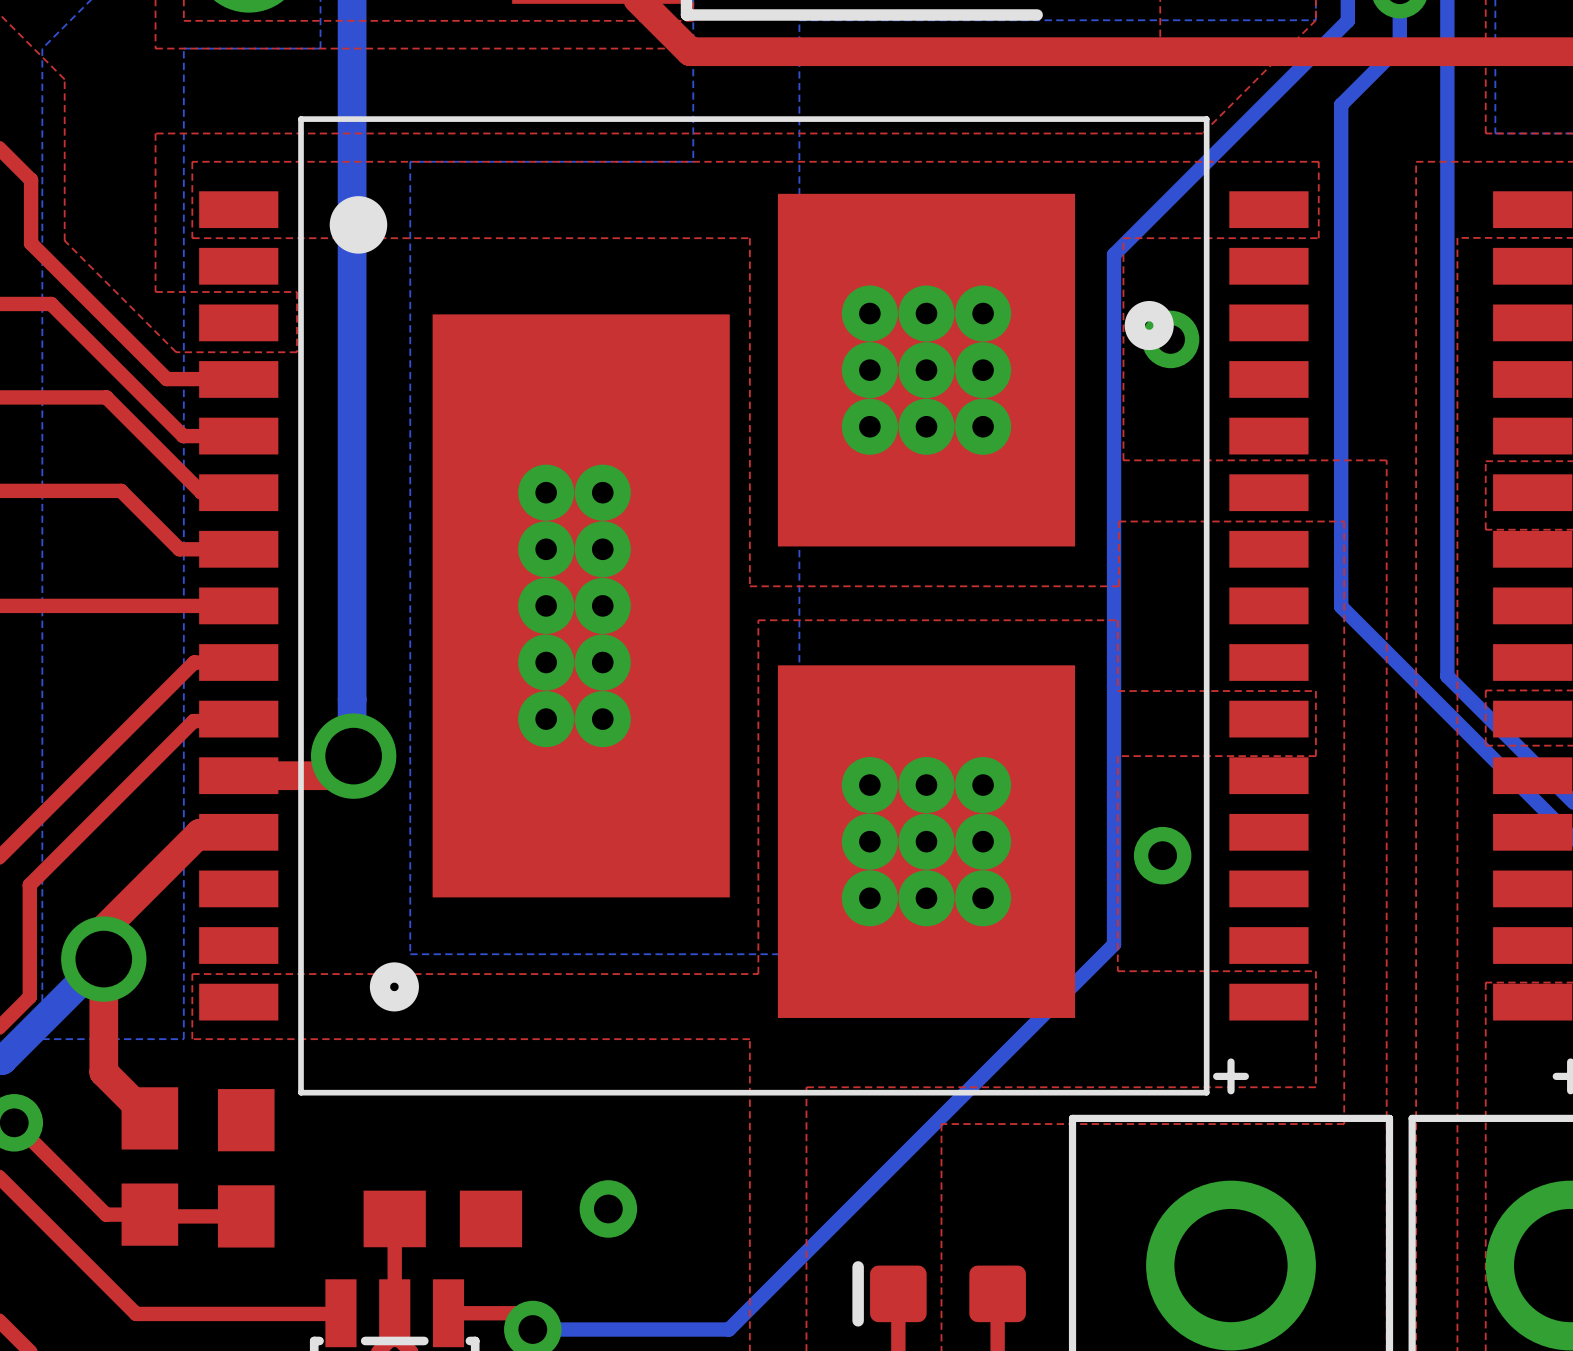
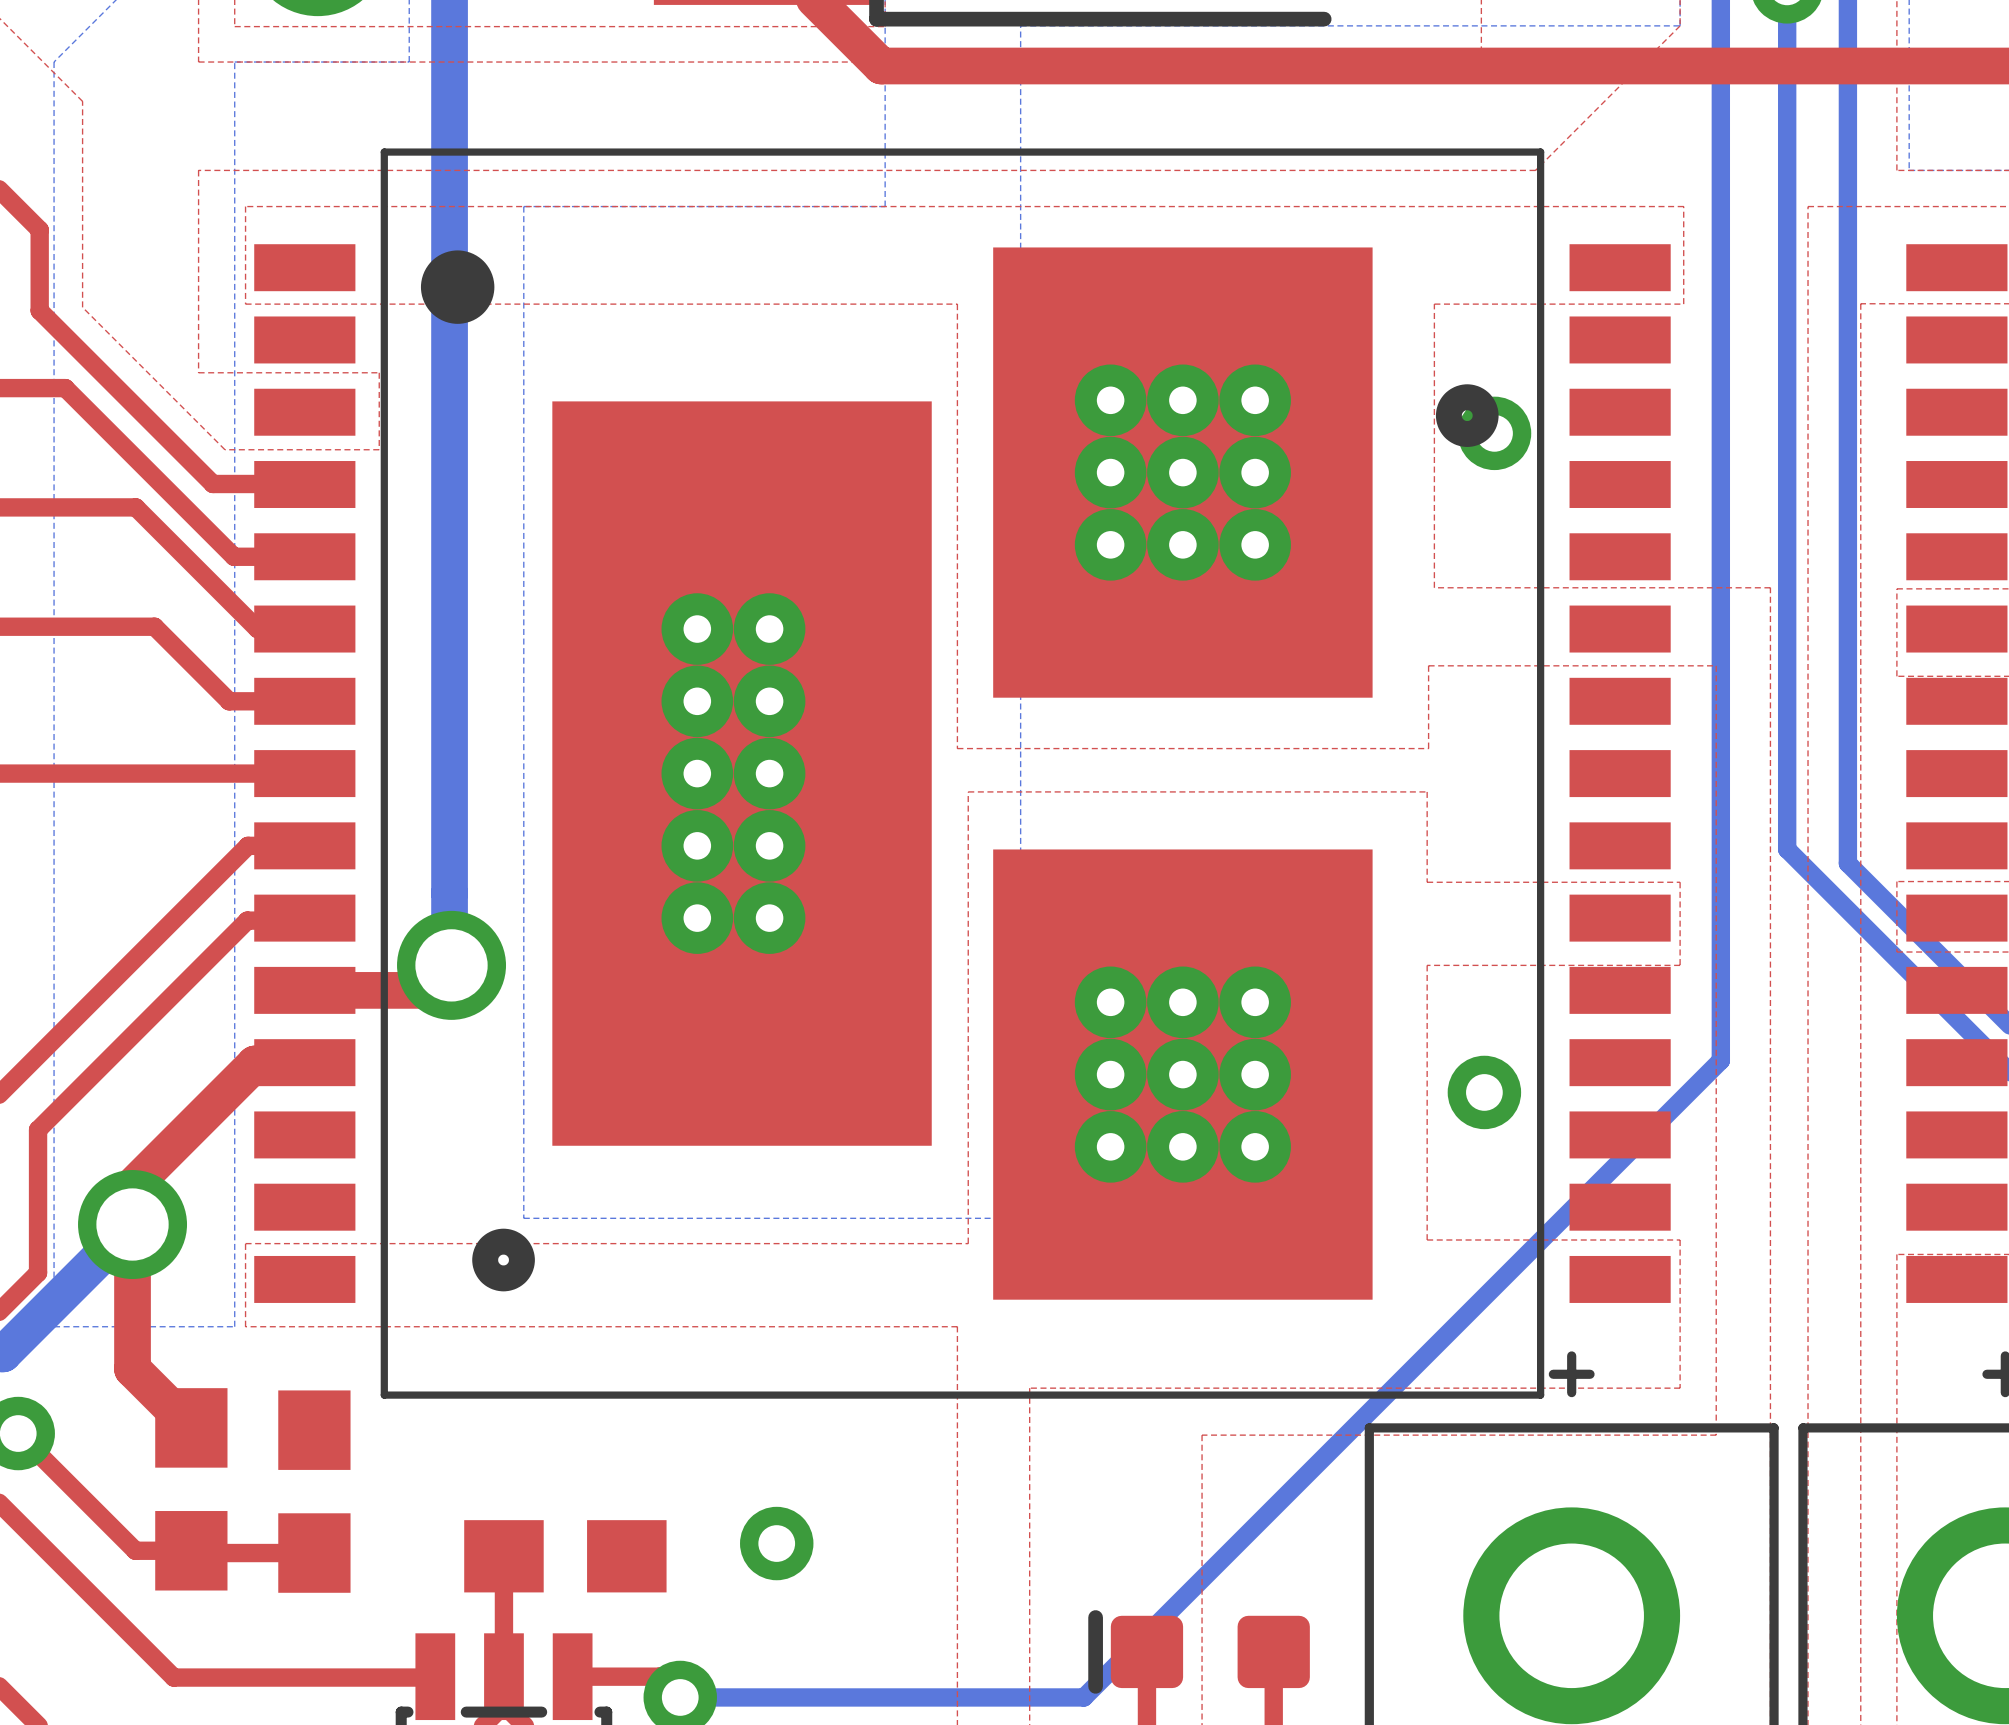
bottom track: (1347, 20) (1114, 254) (1114, 944) (728, 1329) -> (1720, 26) (1720, 1060) (1083, 1697) (930, 1697)
bottom track: (1399, 46) (1341, 104) (1341, 606) (1399, 665) -> (1787, 59) (1787, 849)

